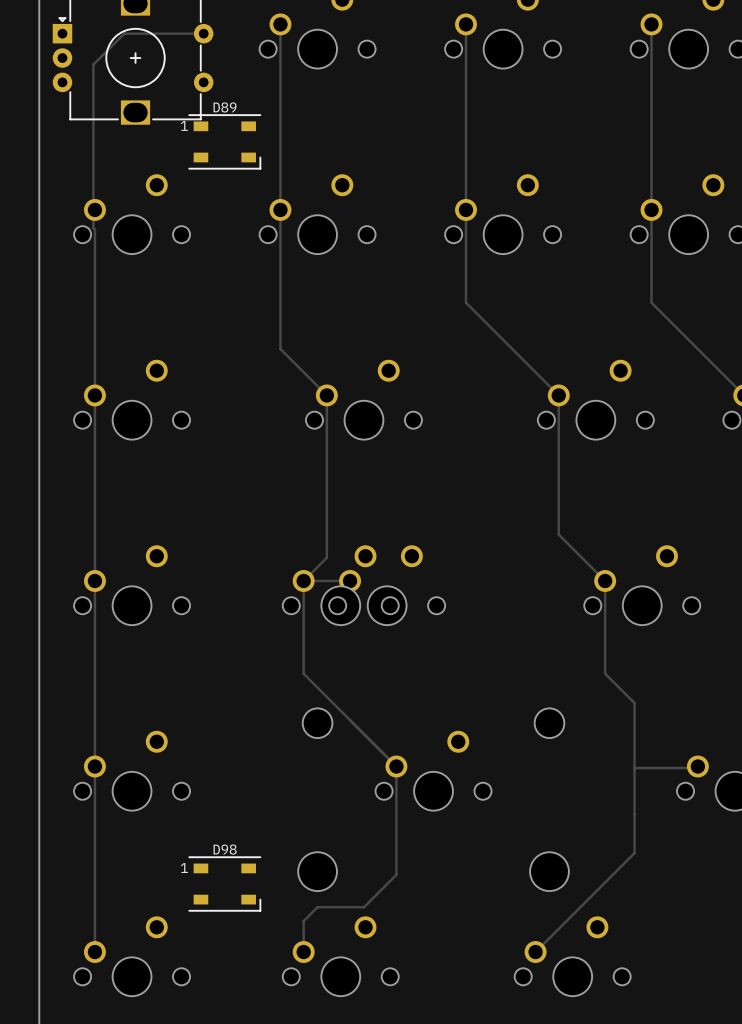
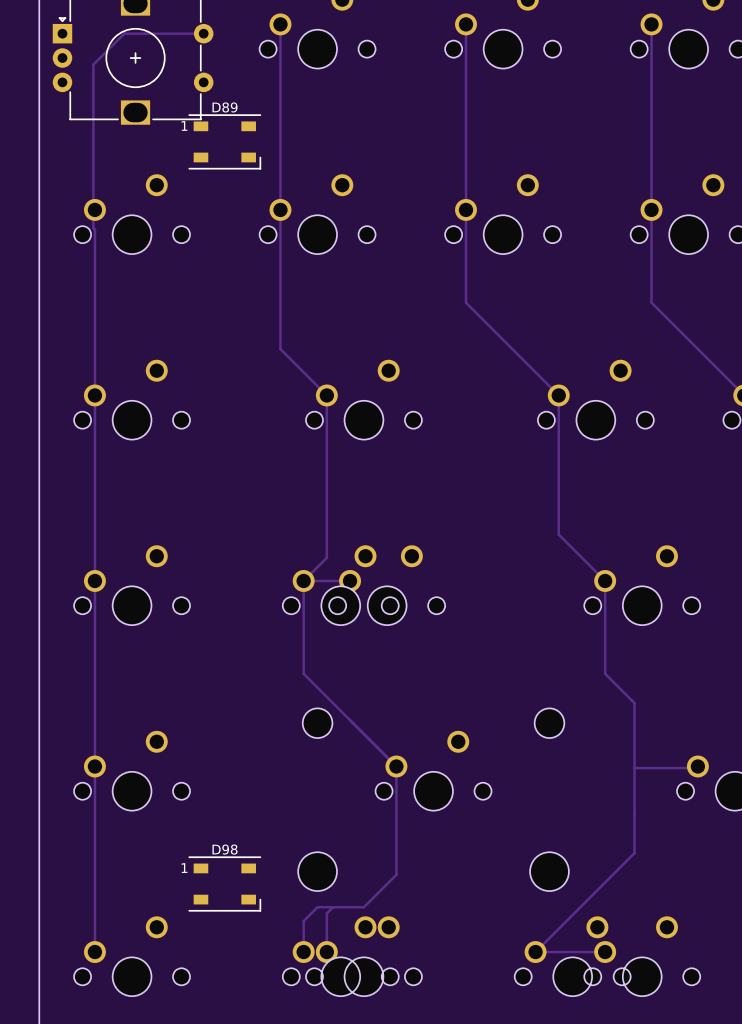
track: none -> (333, 907) (326, 913) (326, 952)
track: none -> (535, 952) (605, 952)
part: none -> (363, 956)
part: none -> (642, 956)

